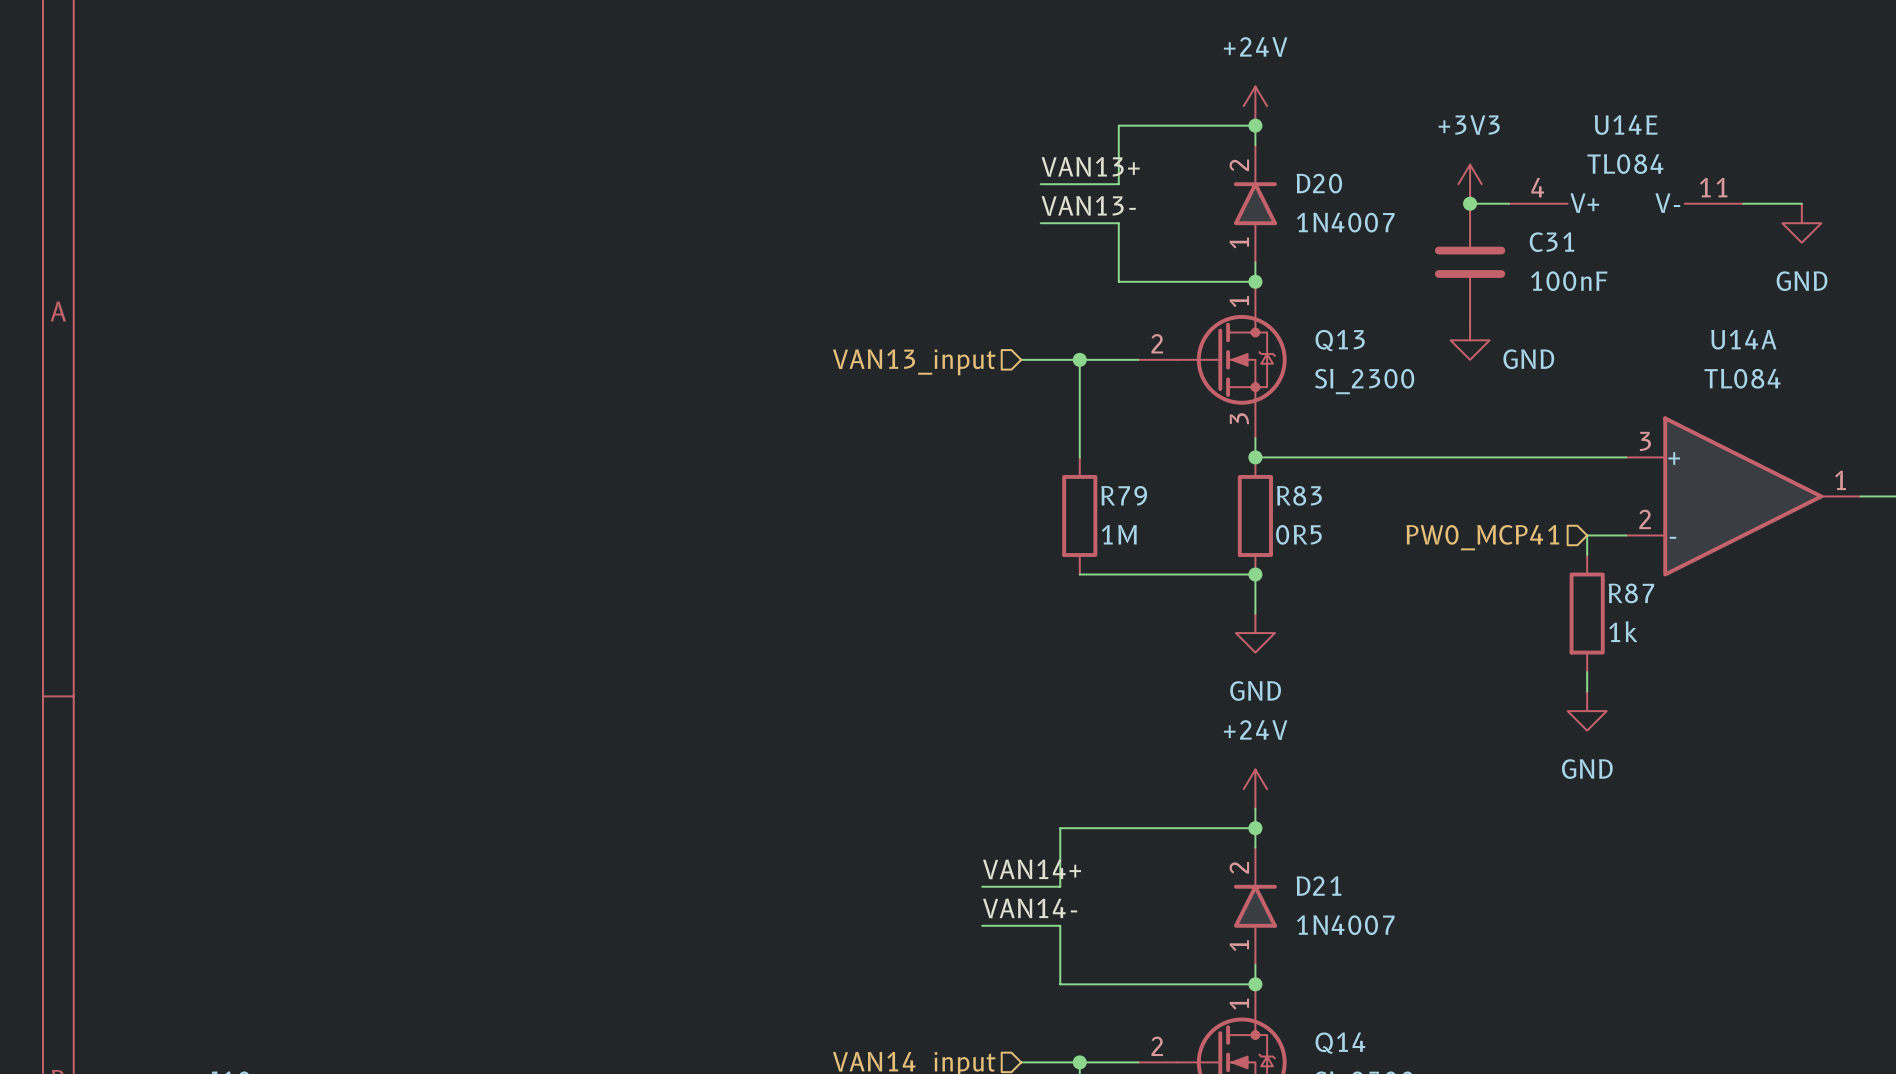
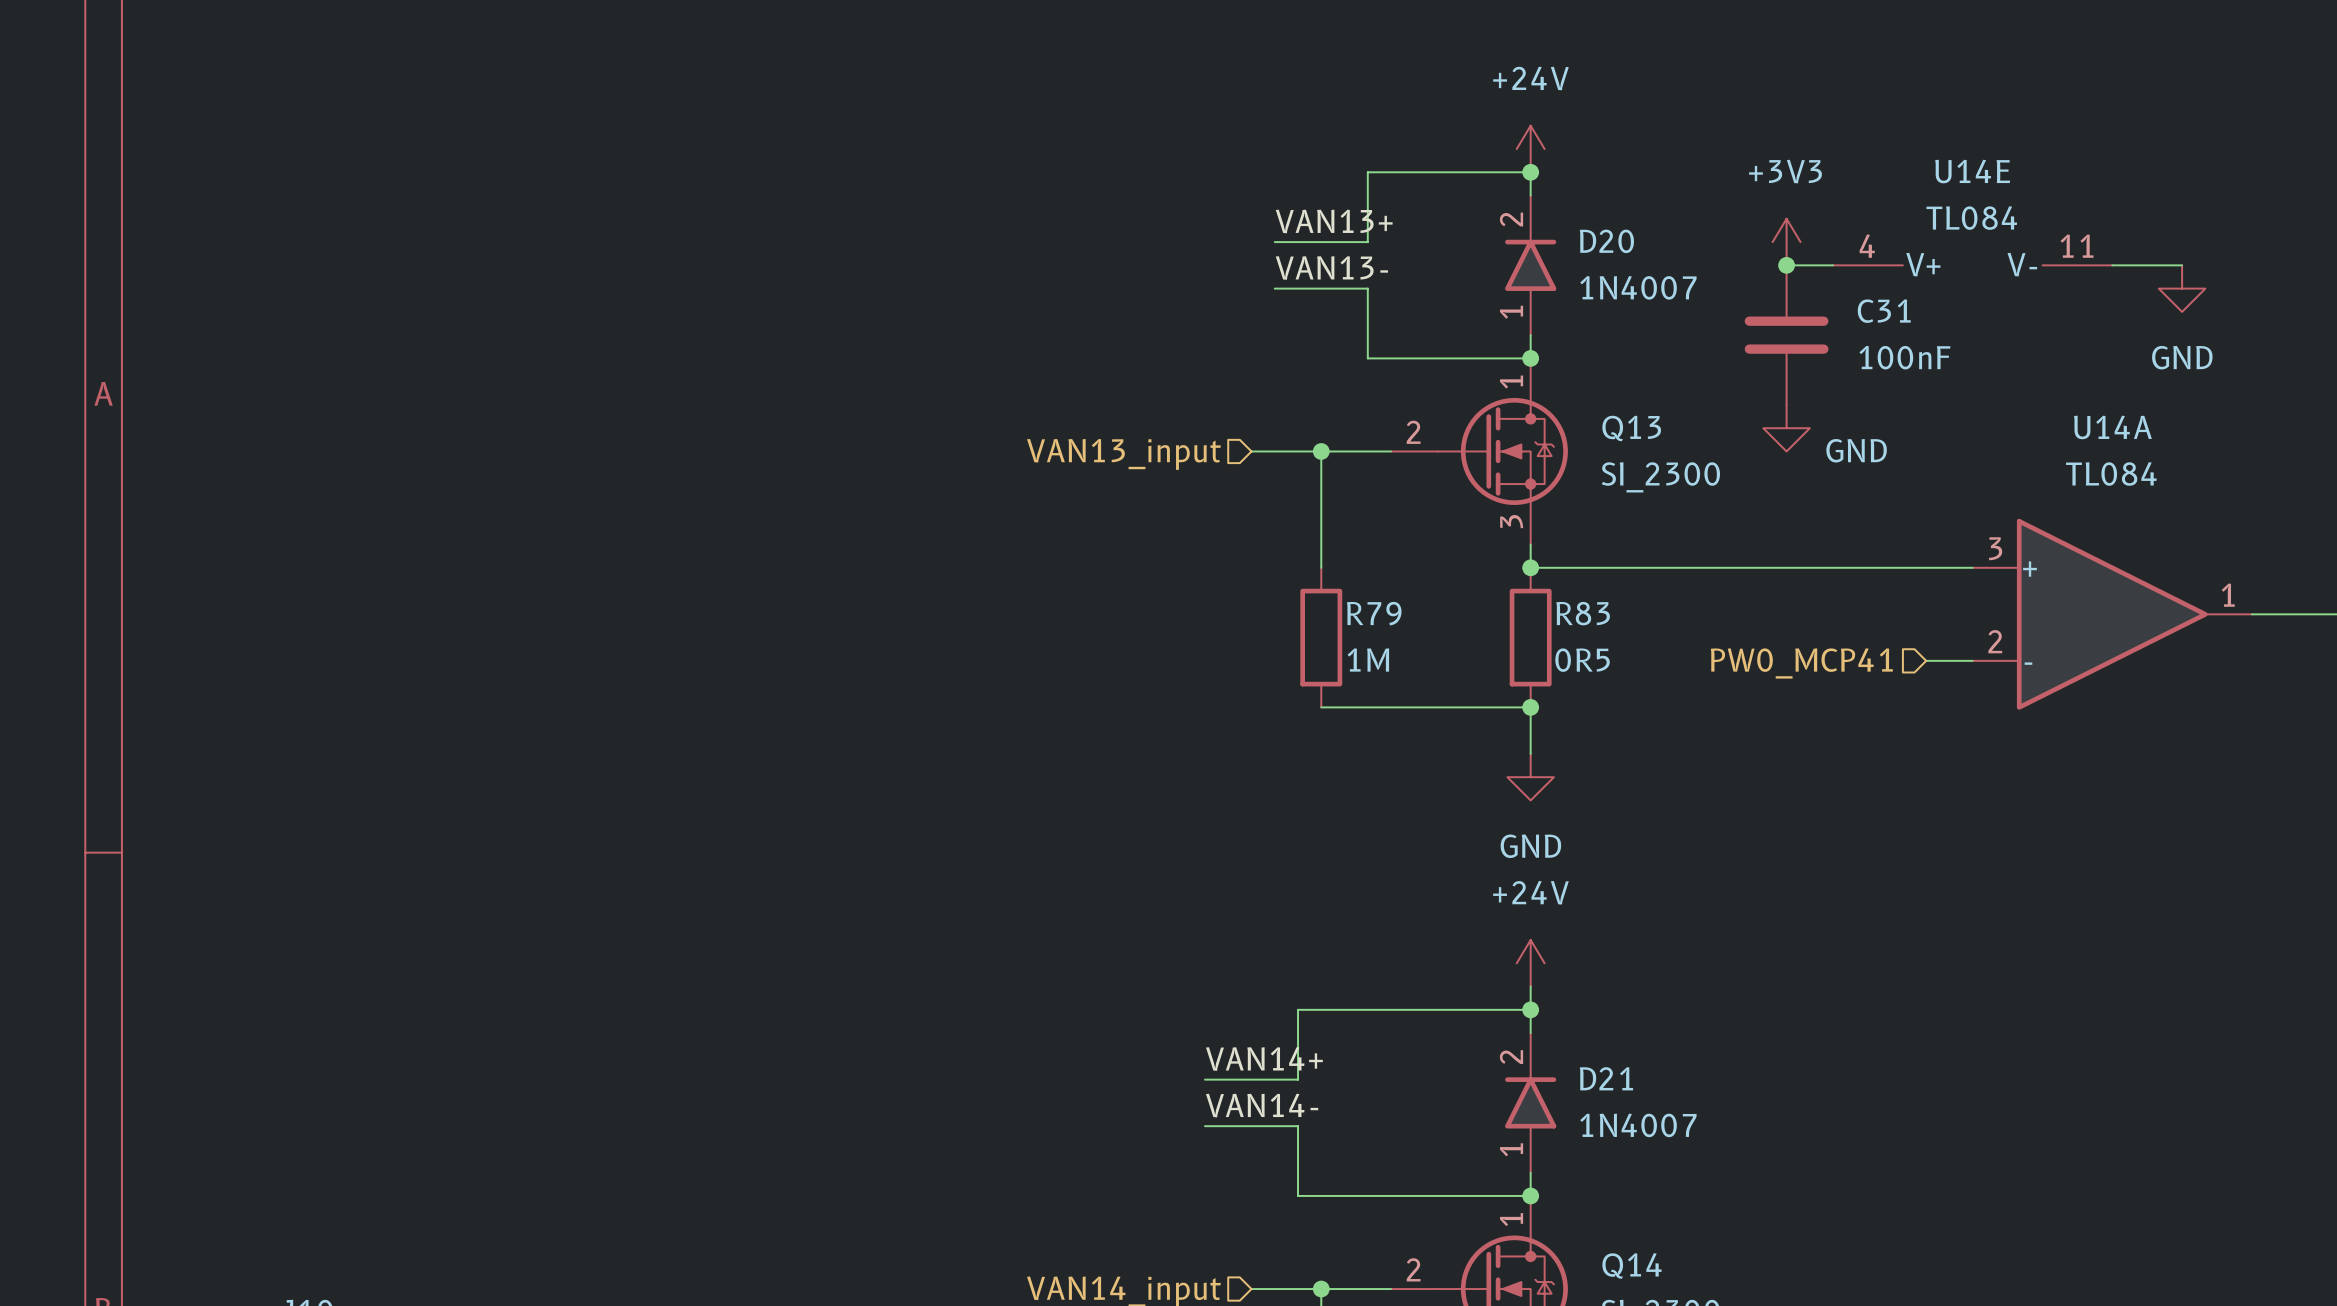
wire: (1587, 535) (1587, 555) -> none
R87: 1k (1587, 613) -> none
wire: (1587, 672) (1587, 691) -> none
power symbol: GND (1587, 711) -> none

